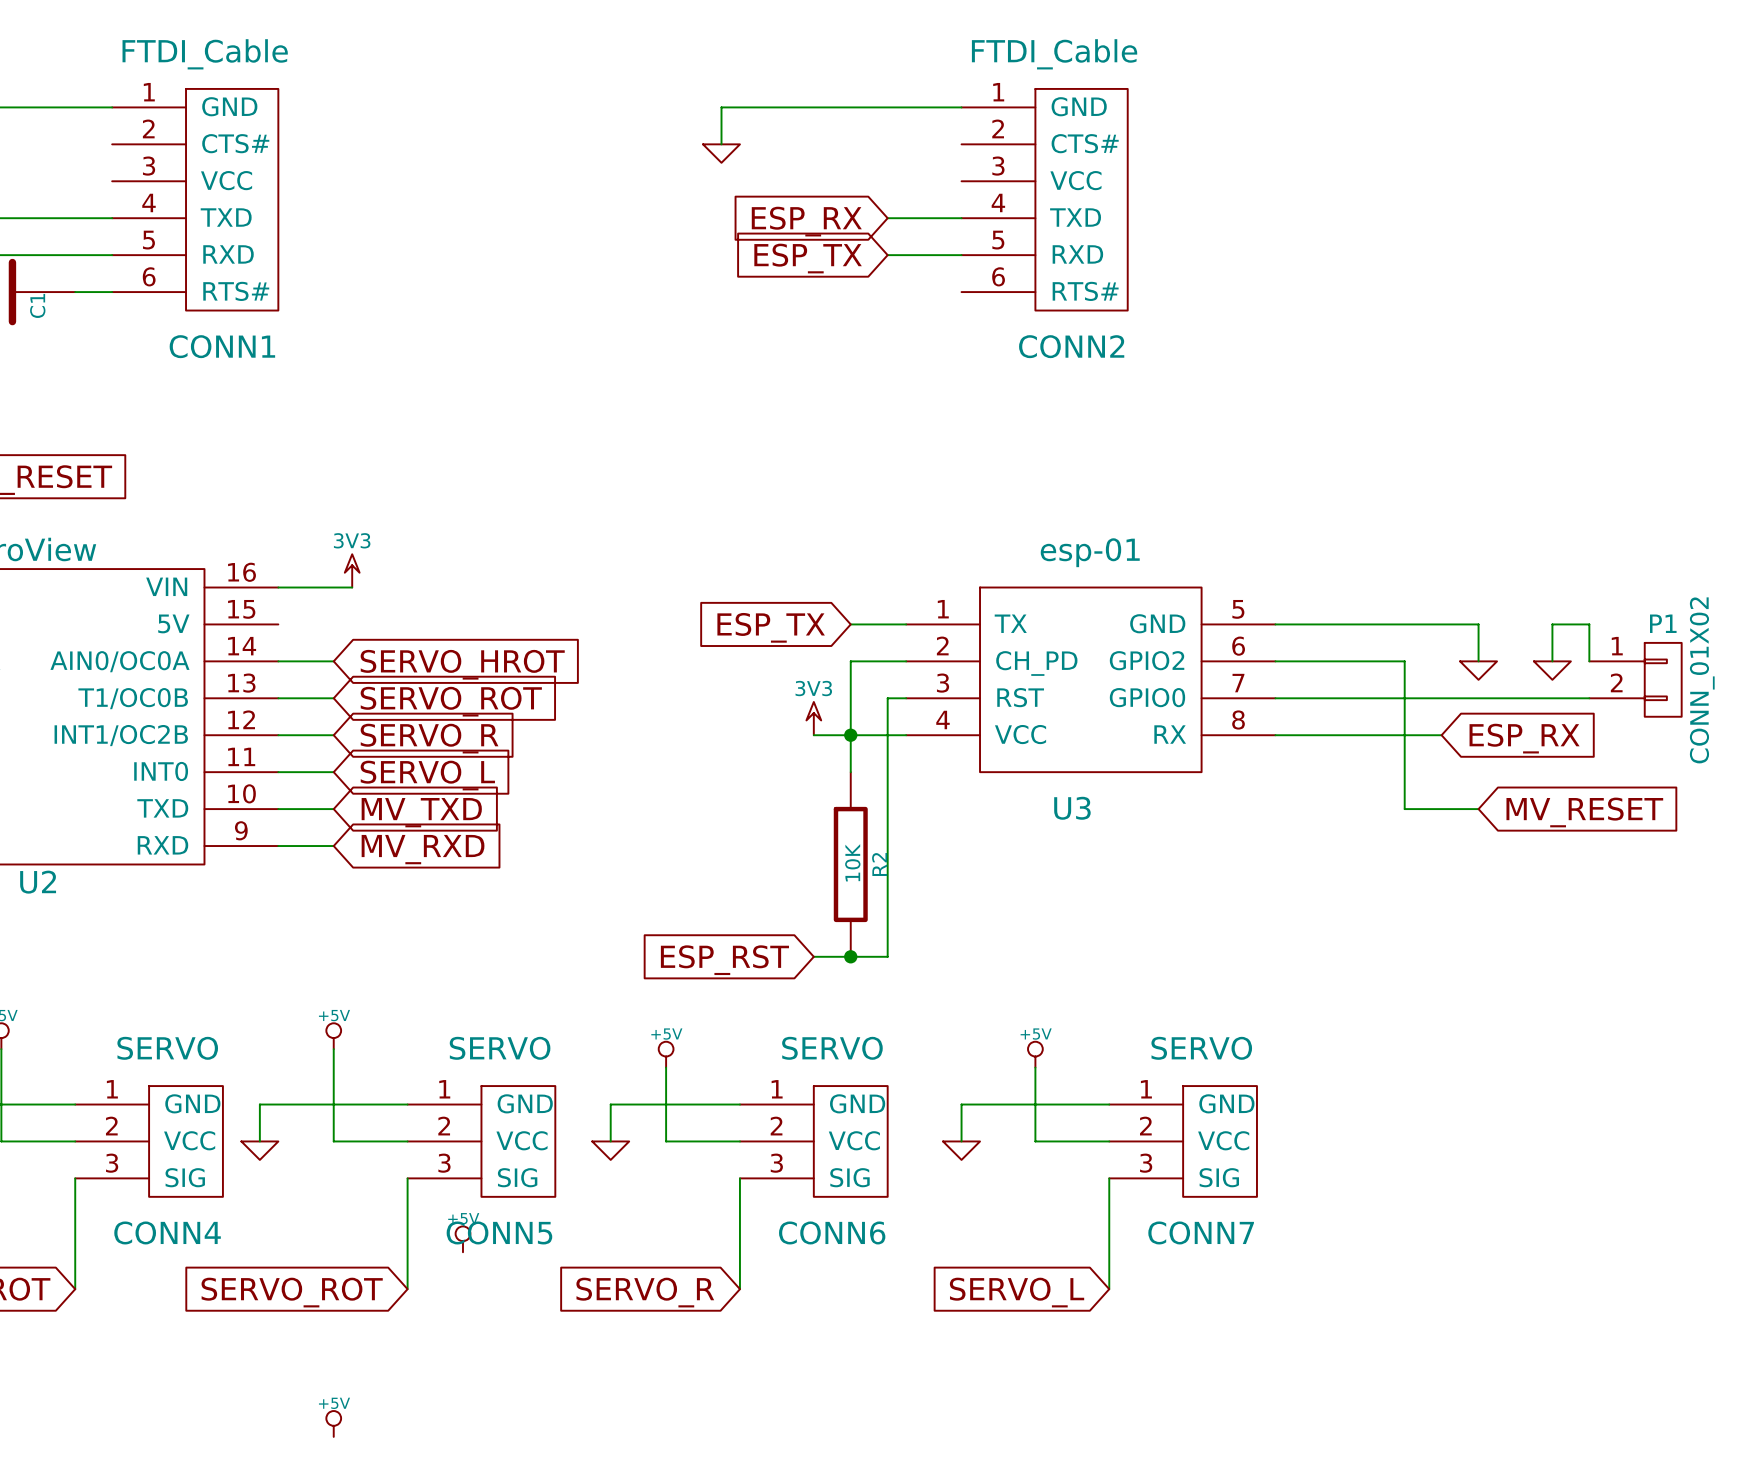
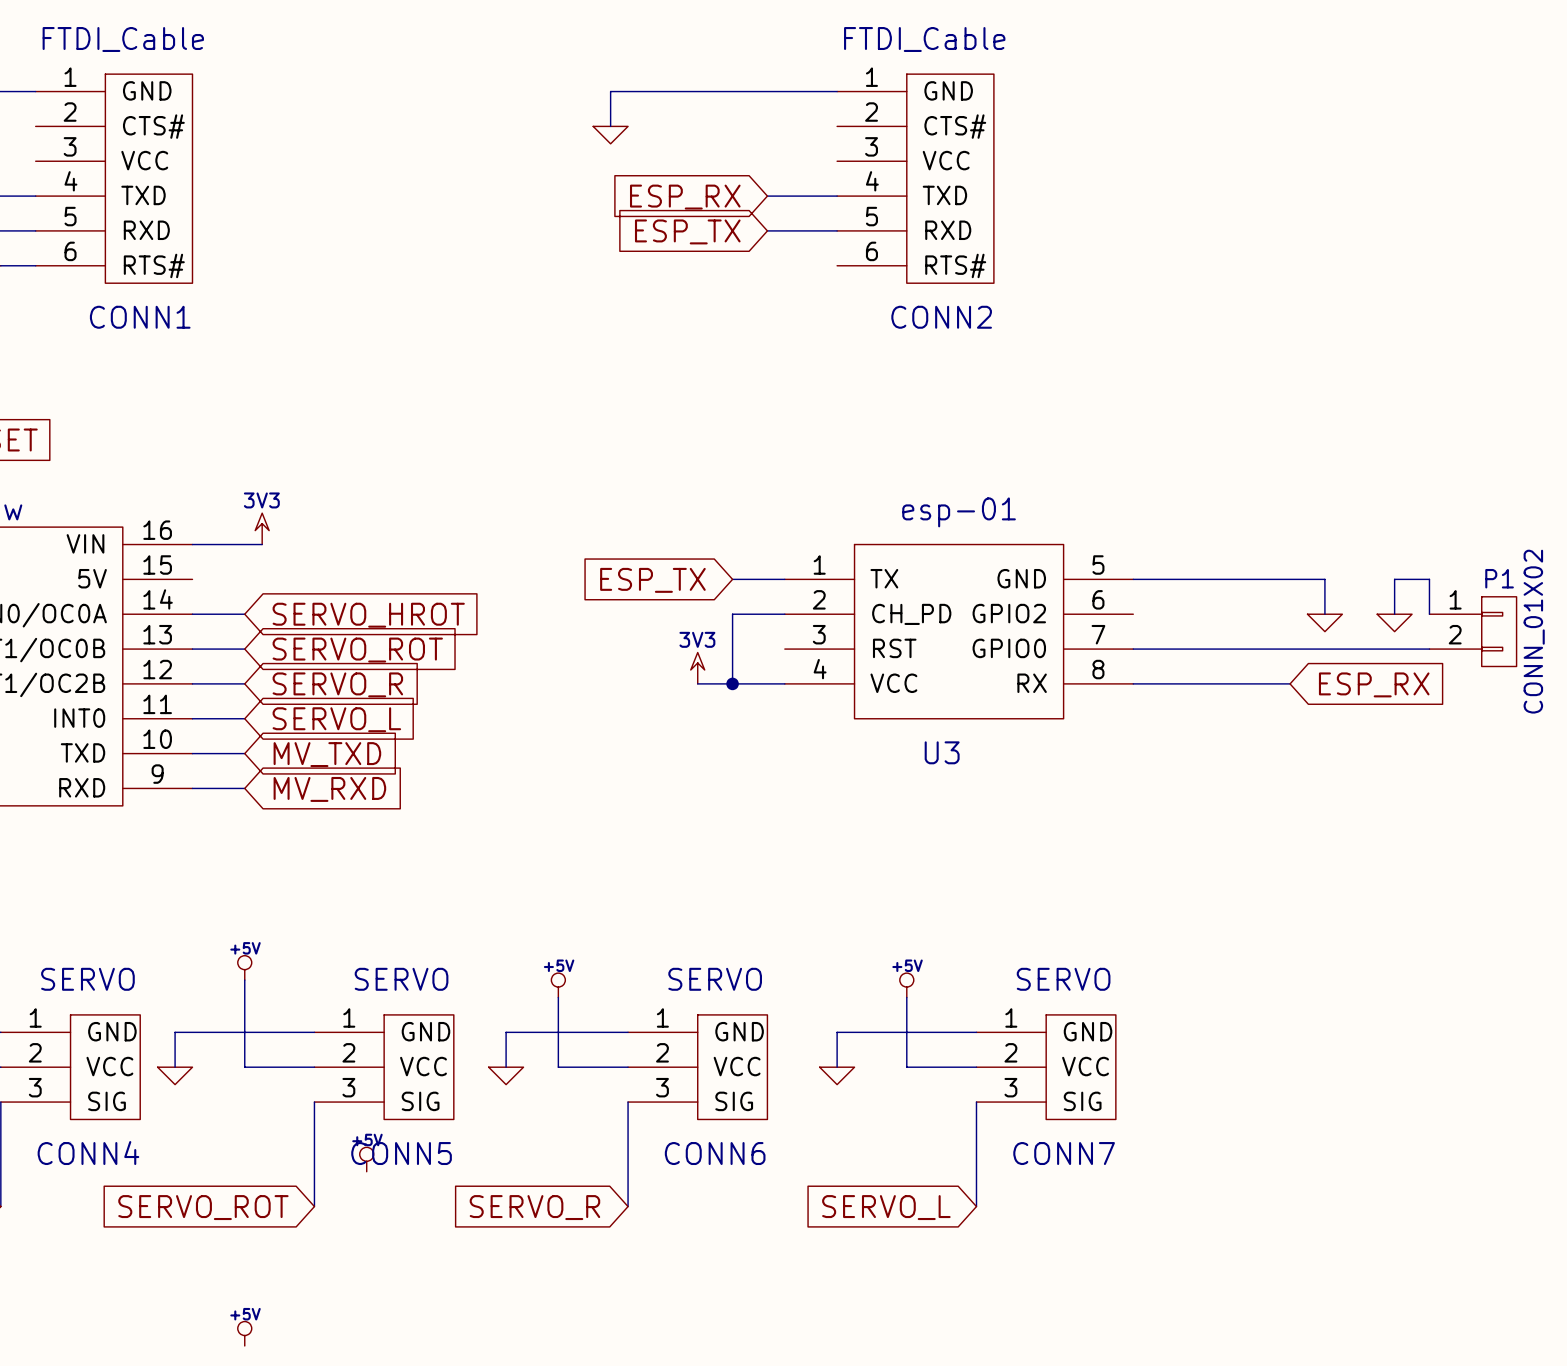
wire: (1275, 661) (1404, 661) (1404, 809) (1478, 809) -> none
wire: (906, 698) (887, 698) (887, 956) (813, 956) -> none
wire: (850, 735) (850, 772) -> none
global label: MV_RESET (1584, 812) -> none
R2: 10K (850, 864) -> none
junction: (850, 956) -> none
global label: ESP_RST (724, 960) -> none

